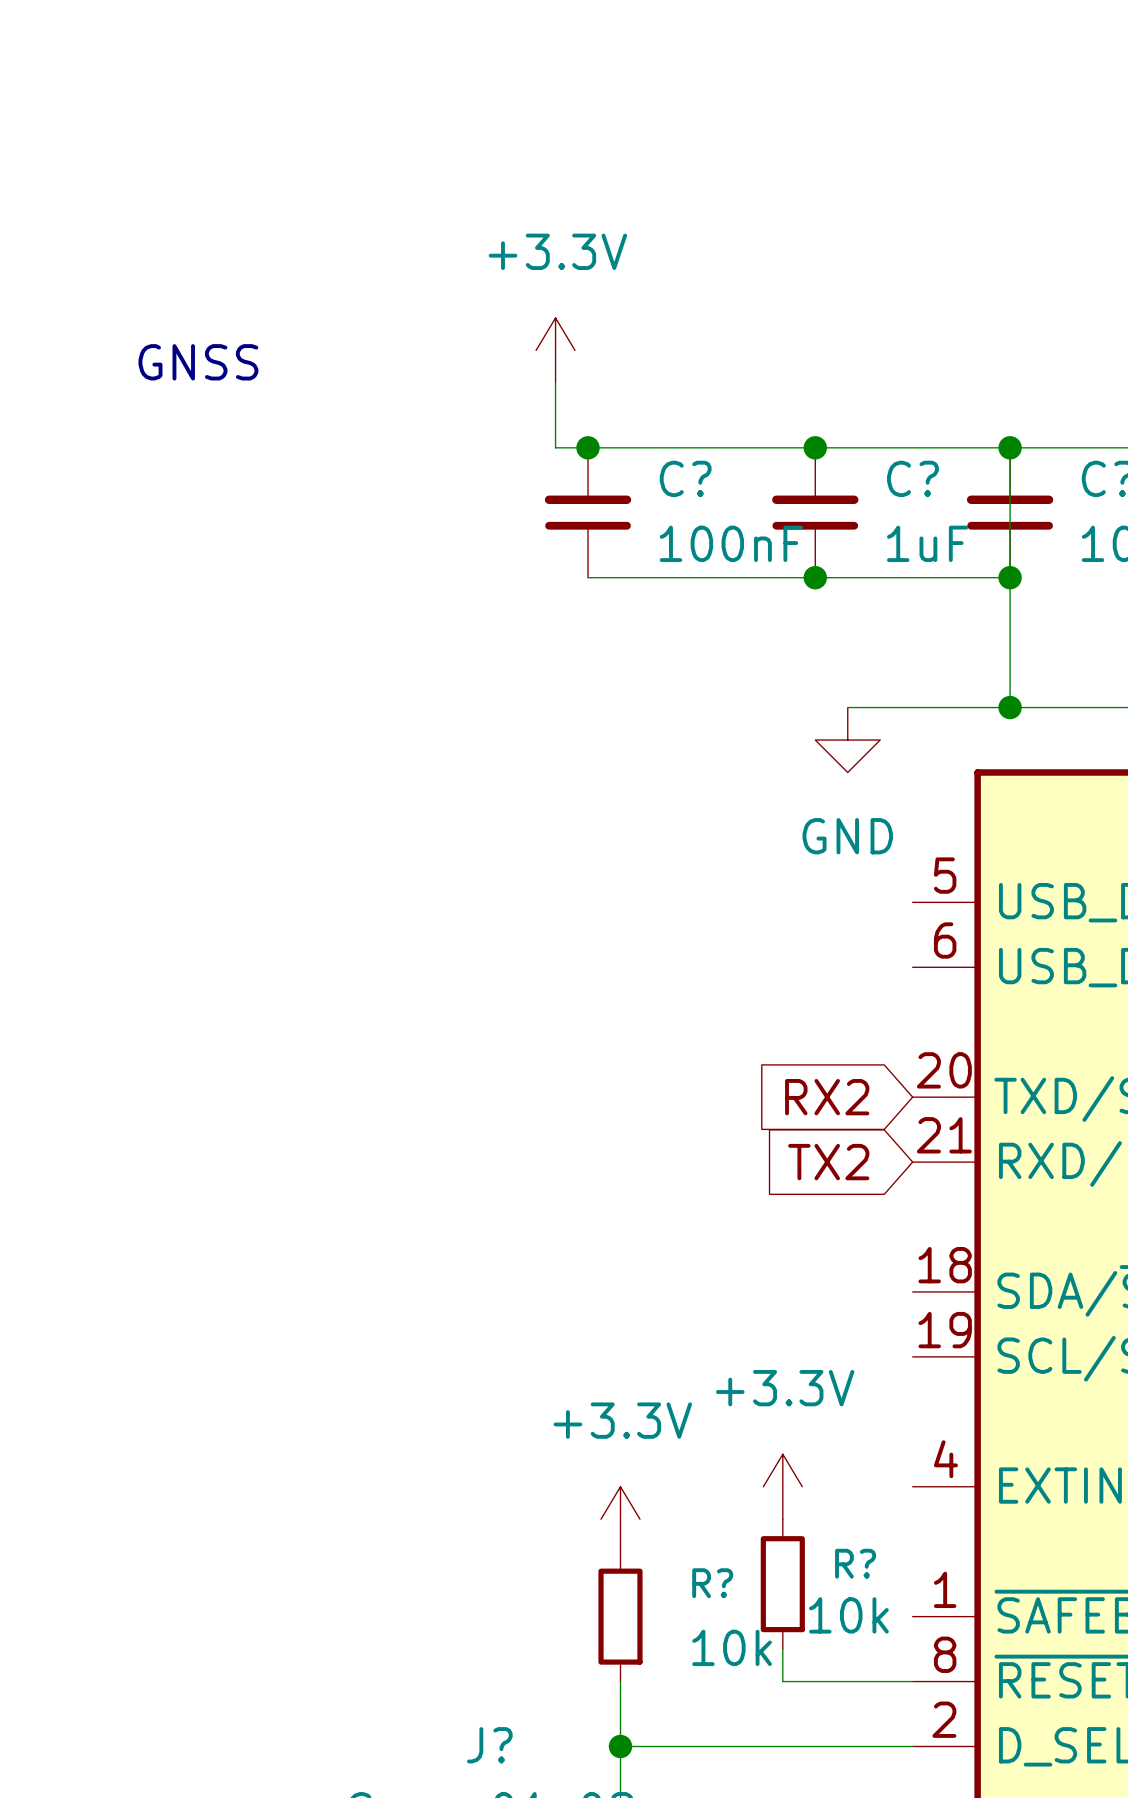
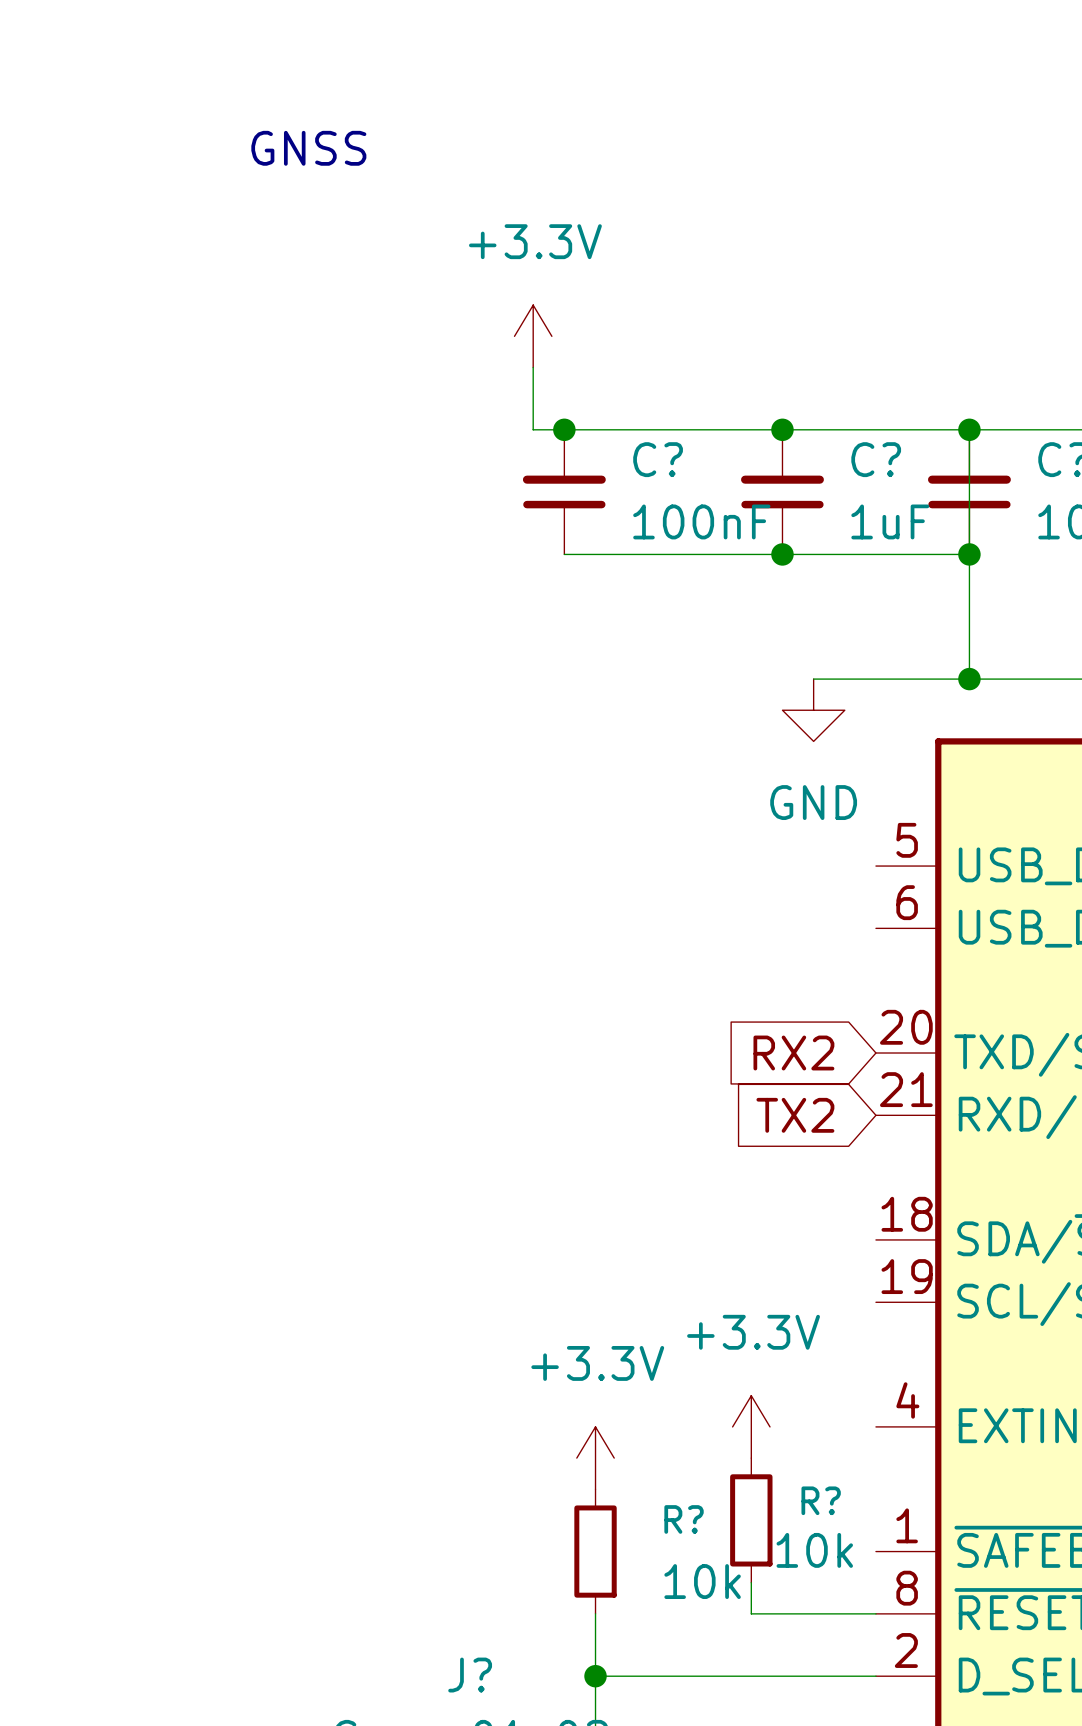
text position: GNSS (198, 362) -> GNSS (308, 148)

